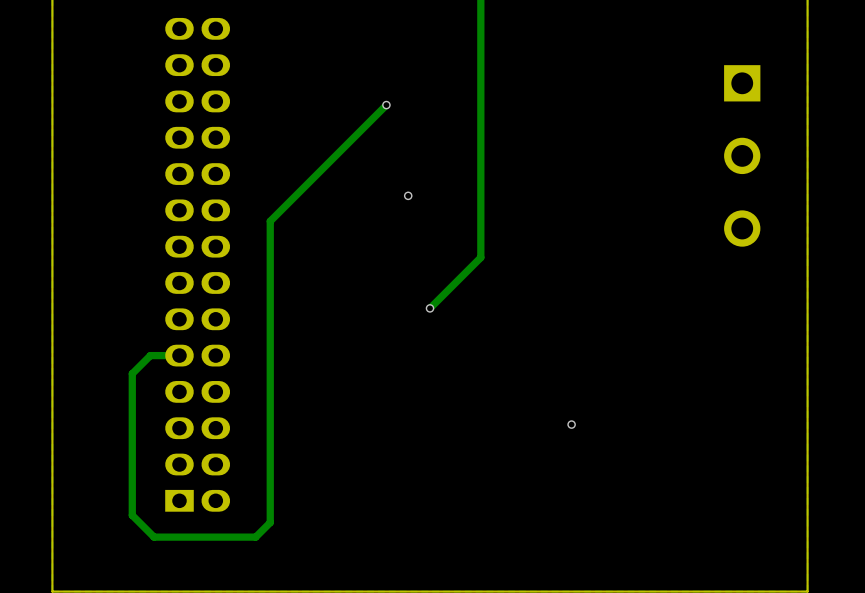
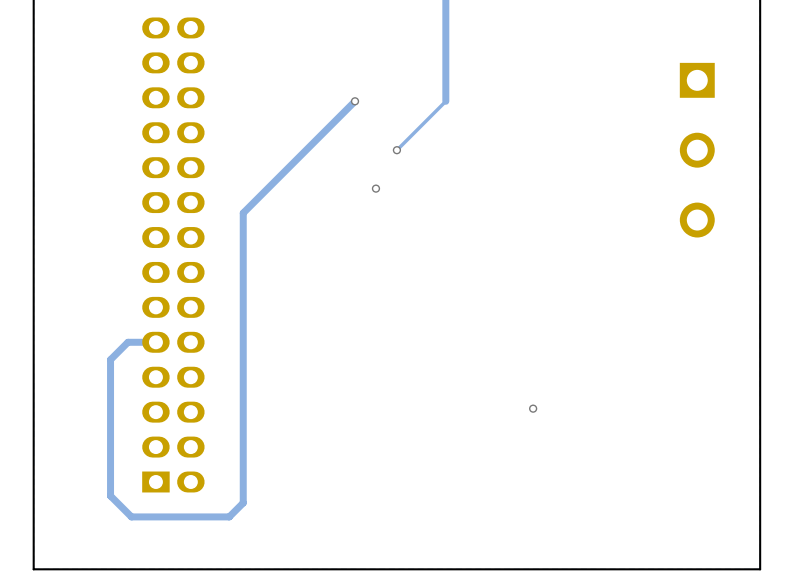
track: (480, 105) (480, 257) (430, 308) -> (445, 101) (396, 150)
via: none -> (396, 150)
via: (430, 308) -> none

